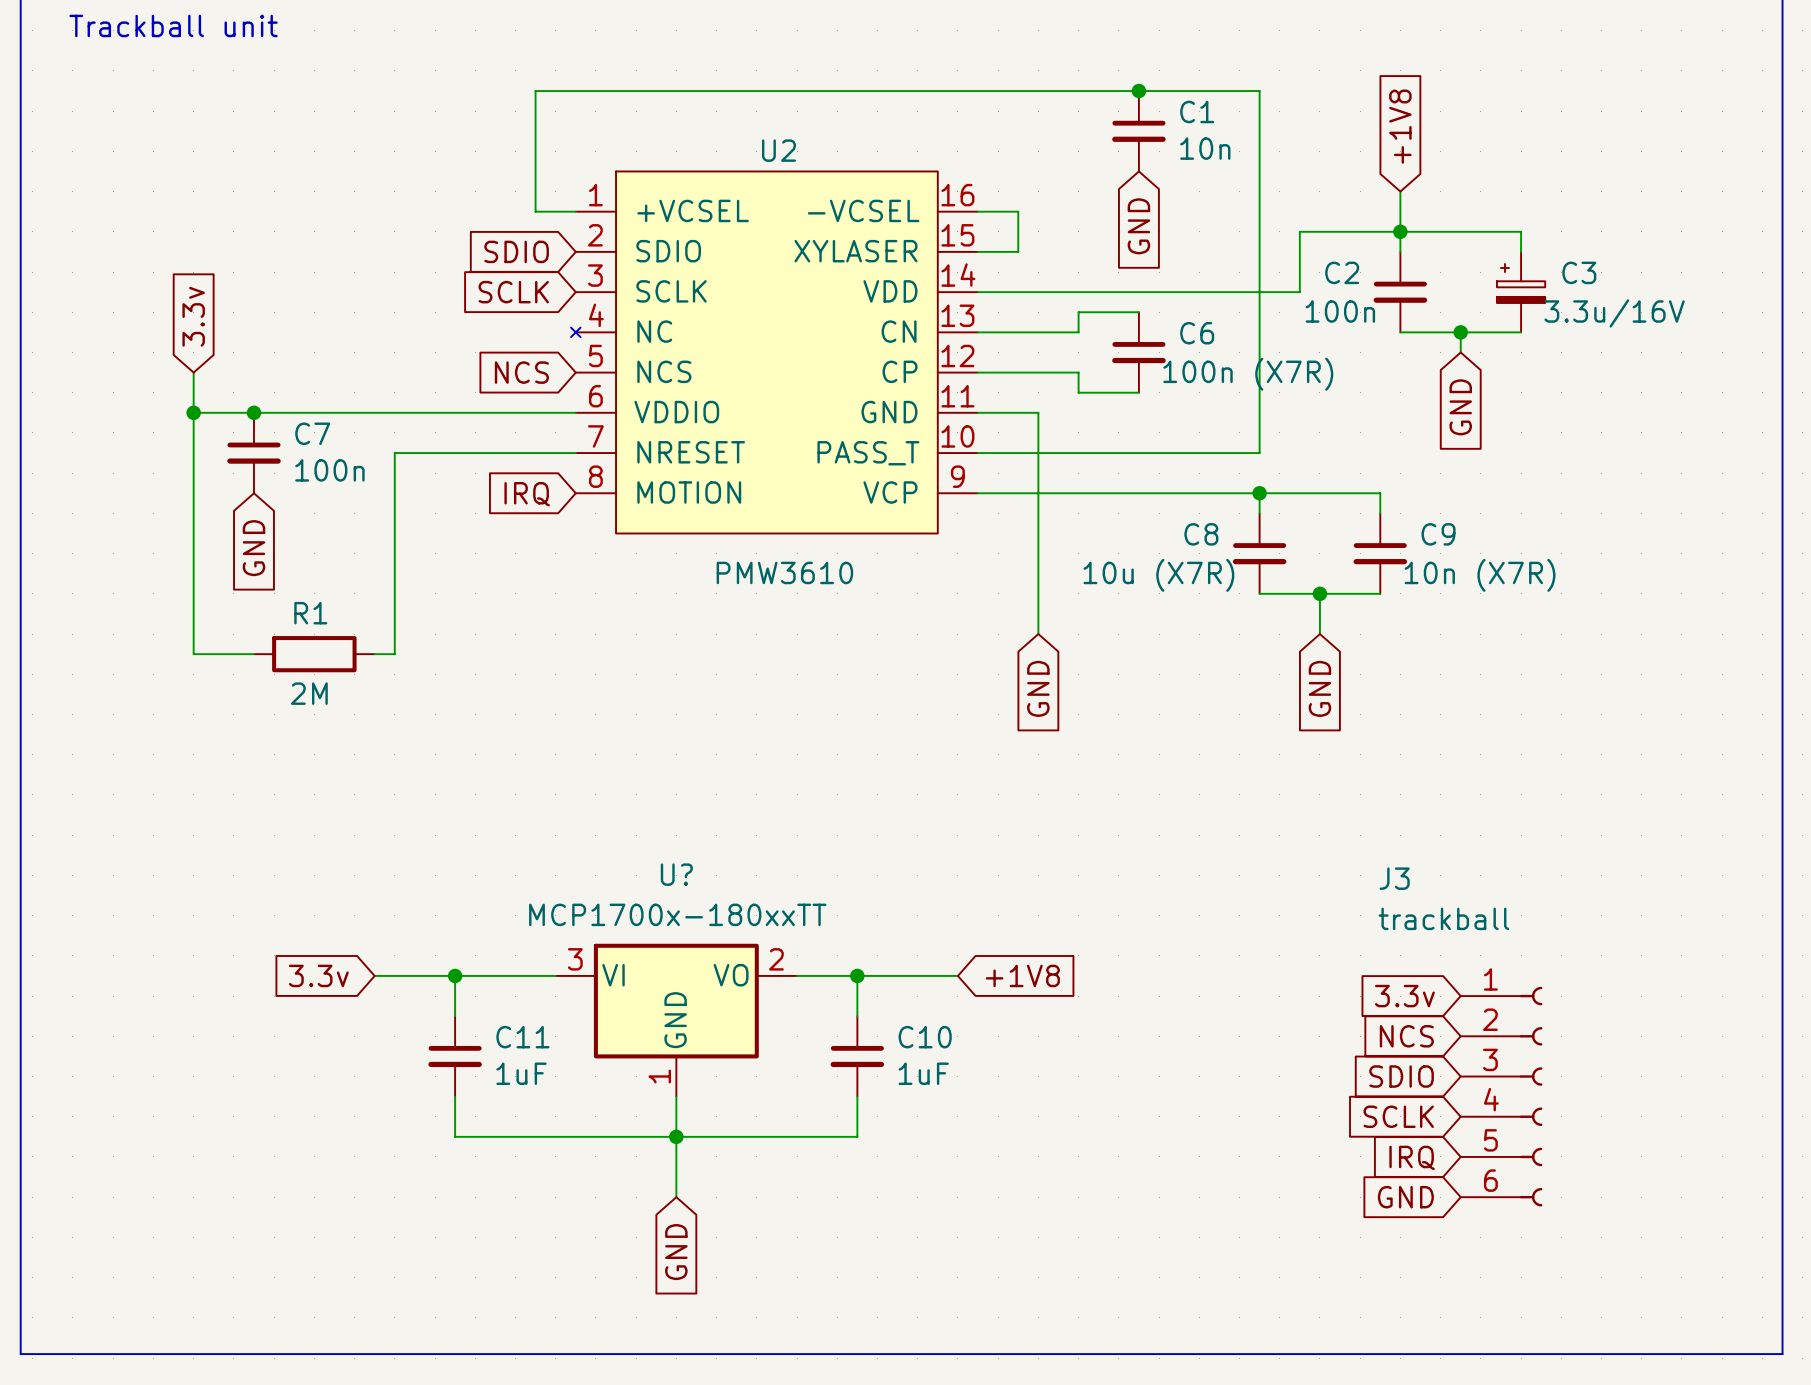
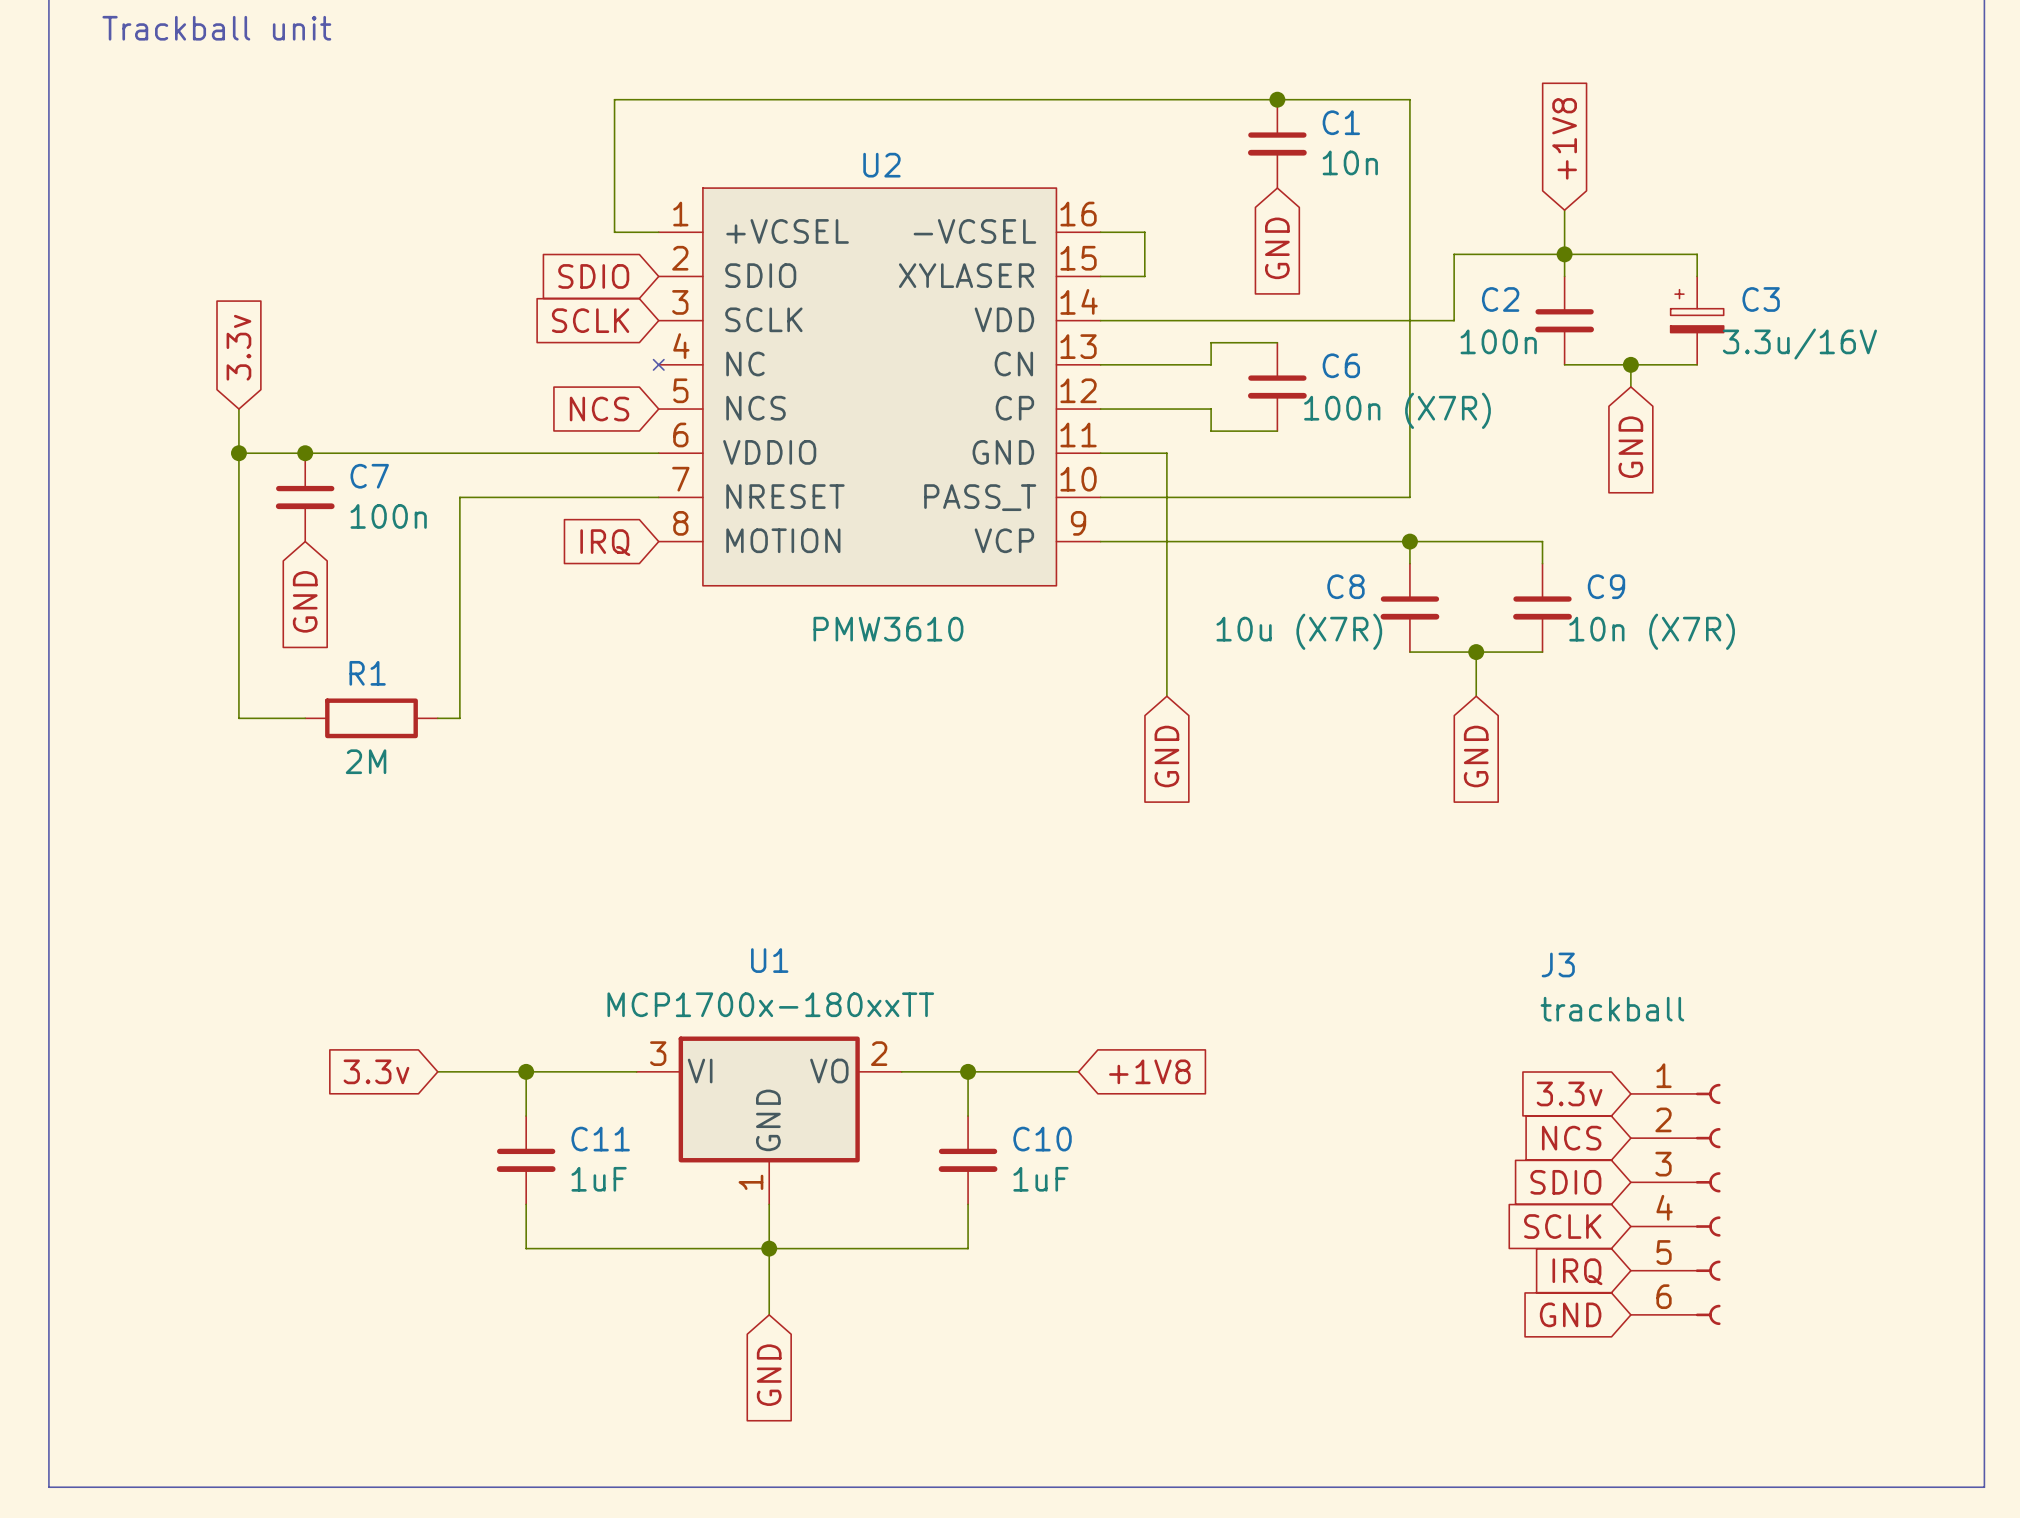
U? name: U? (676, 874) -> U1 (769, 960)

